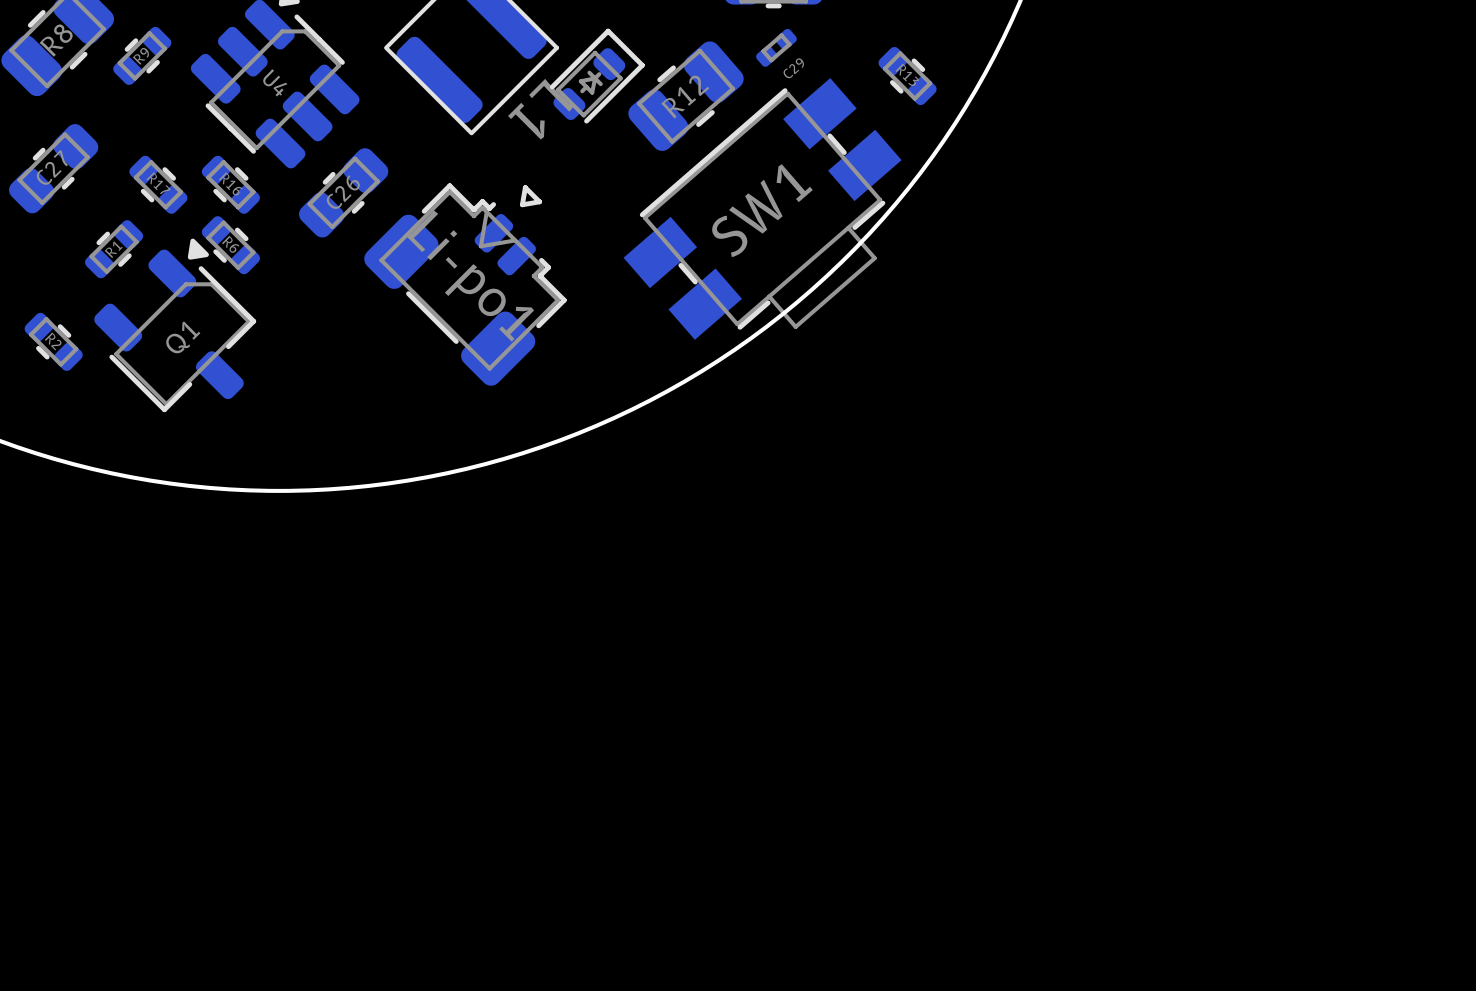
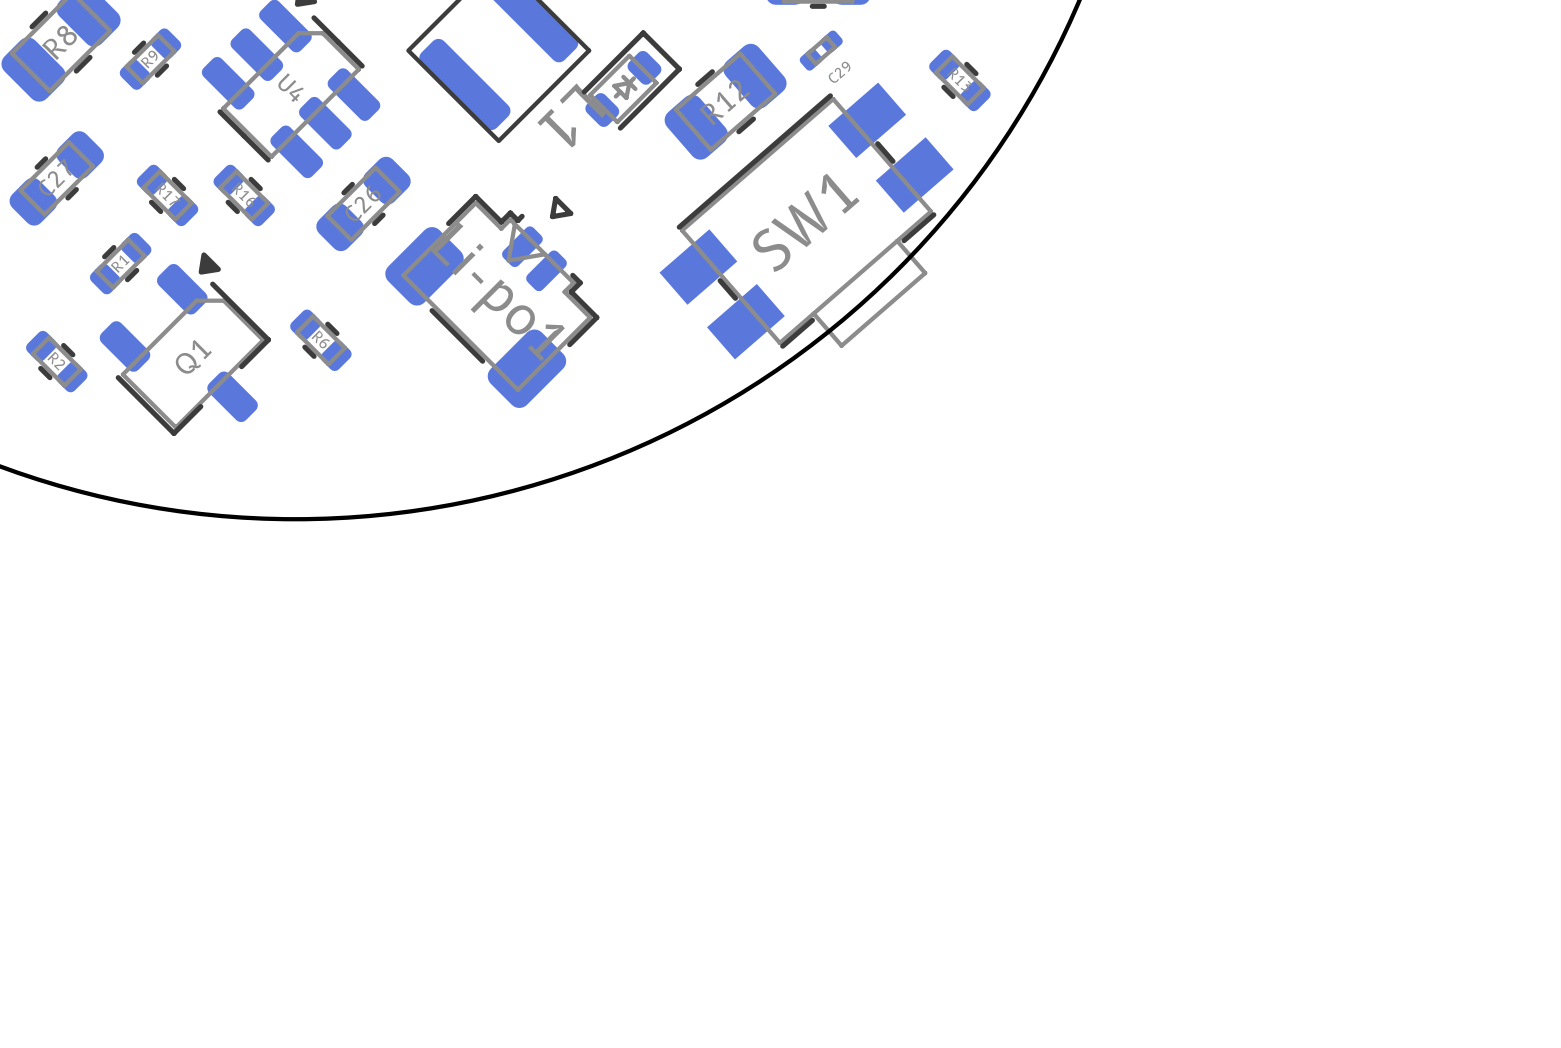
R6 position: (230, 245) -> (320, 340)

